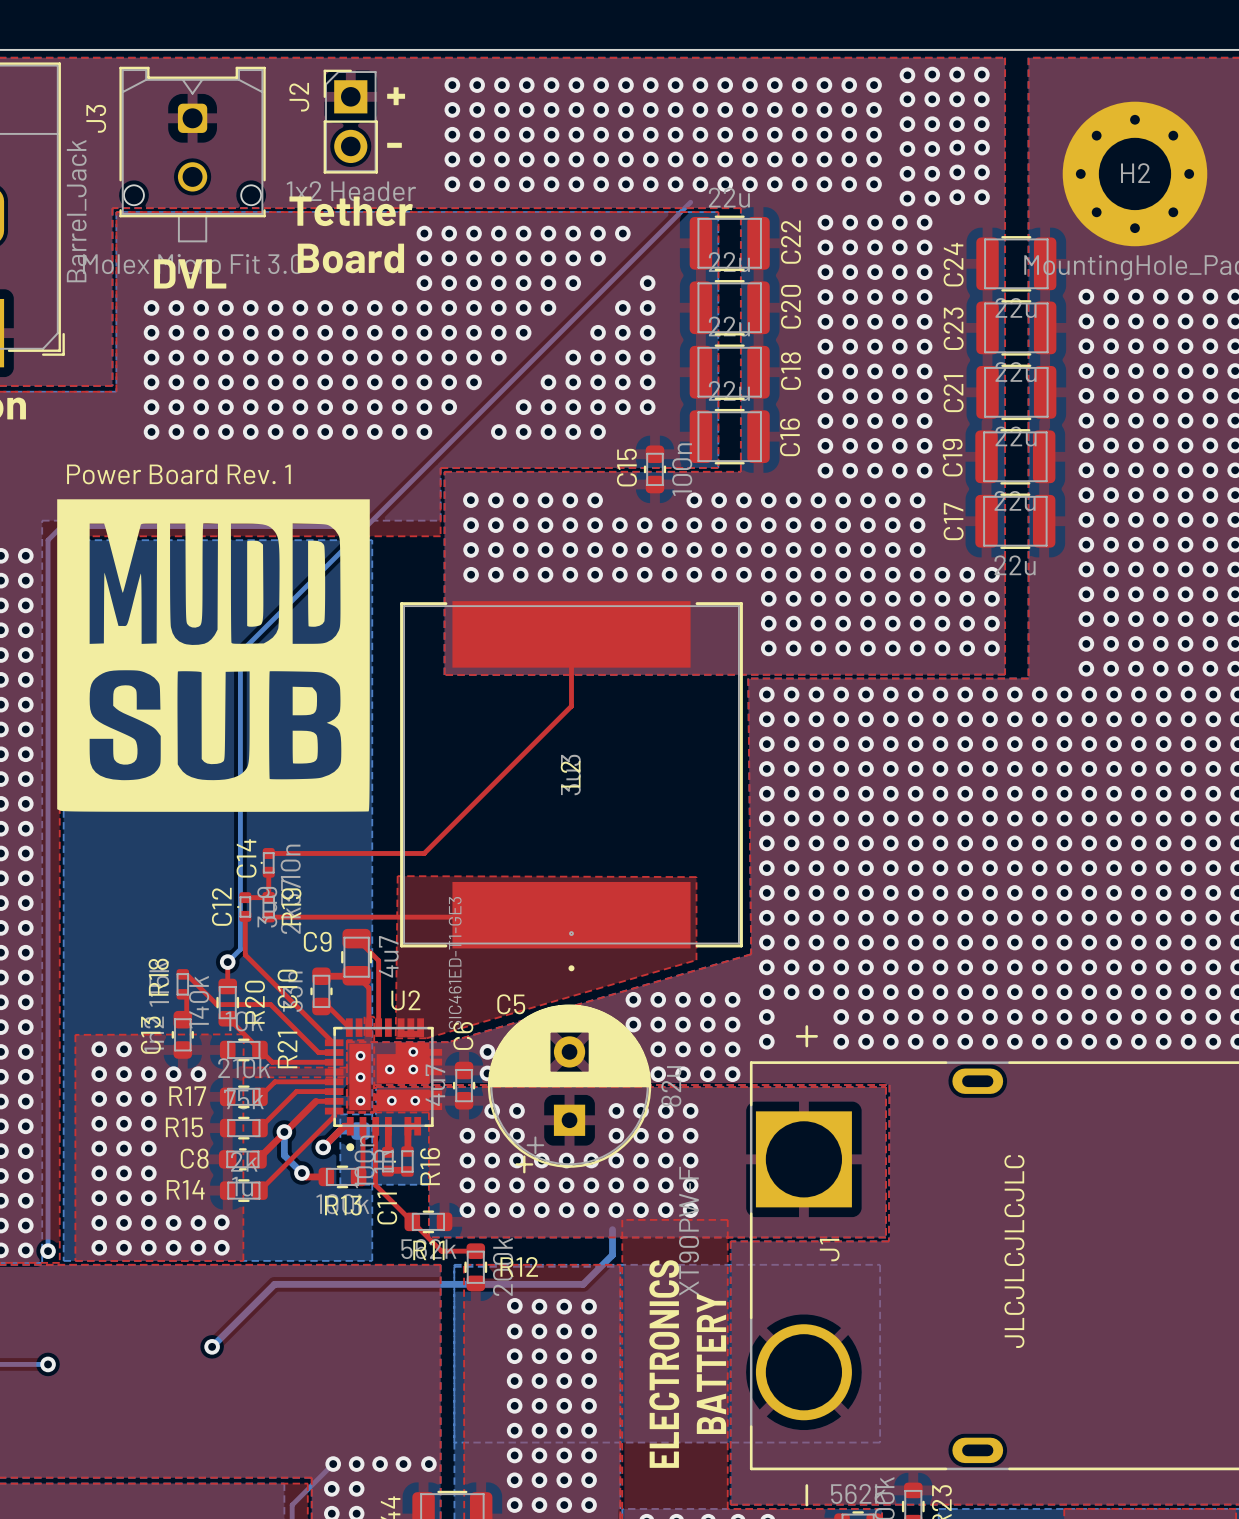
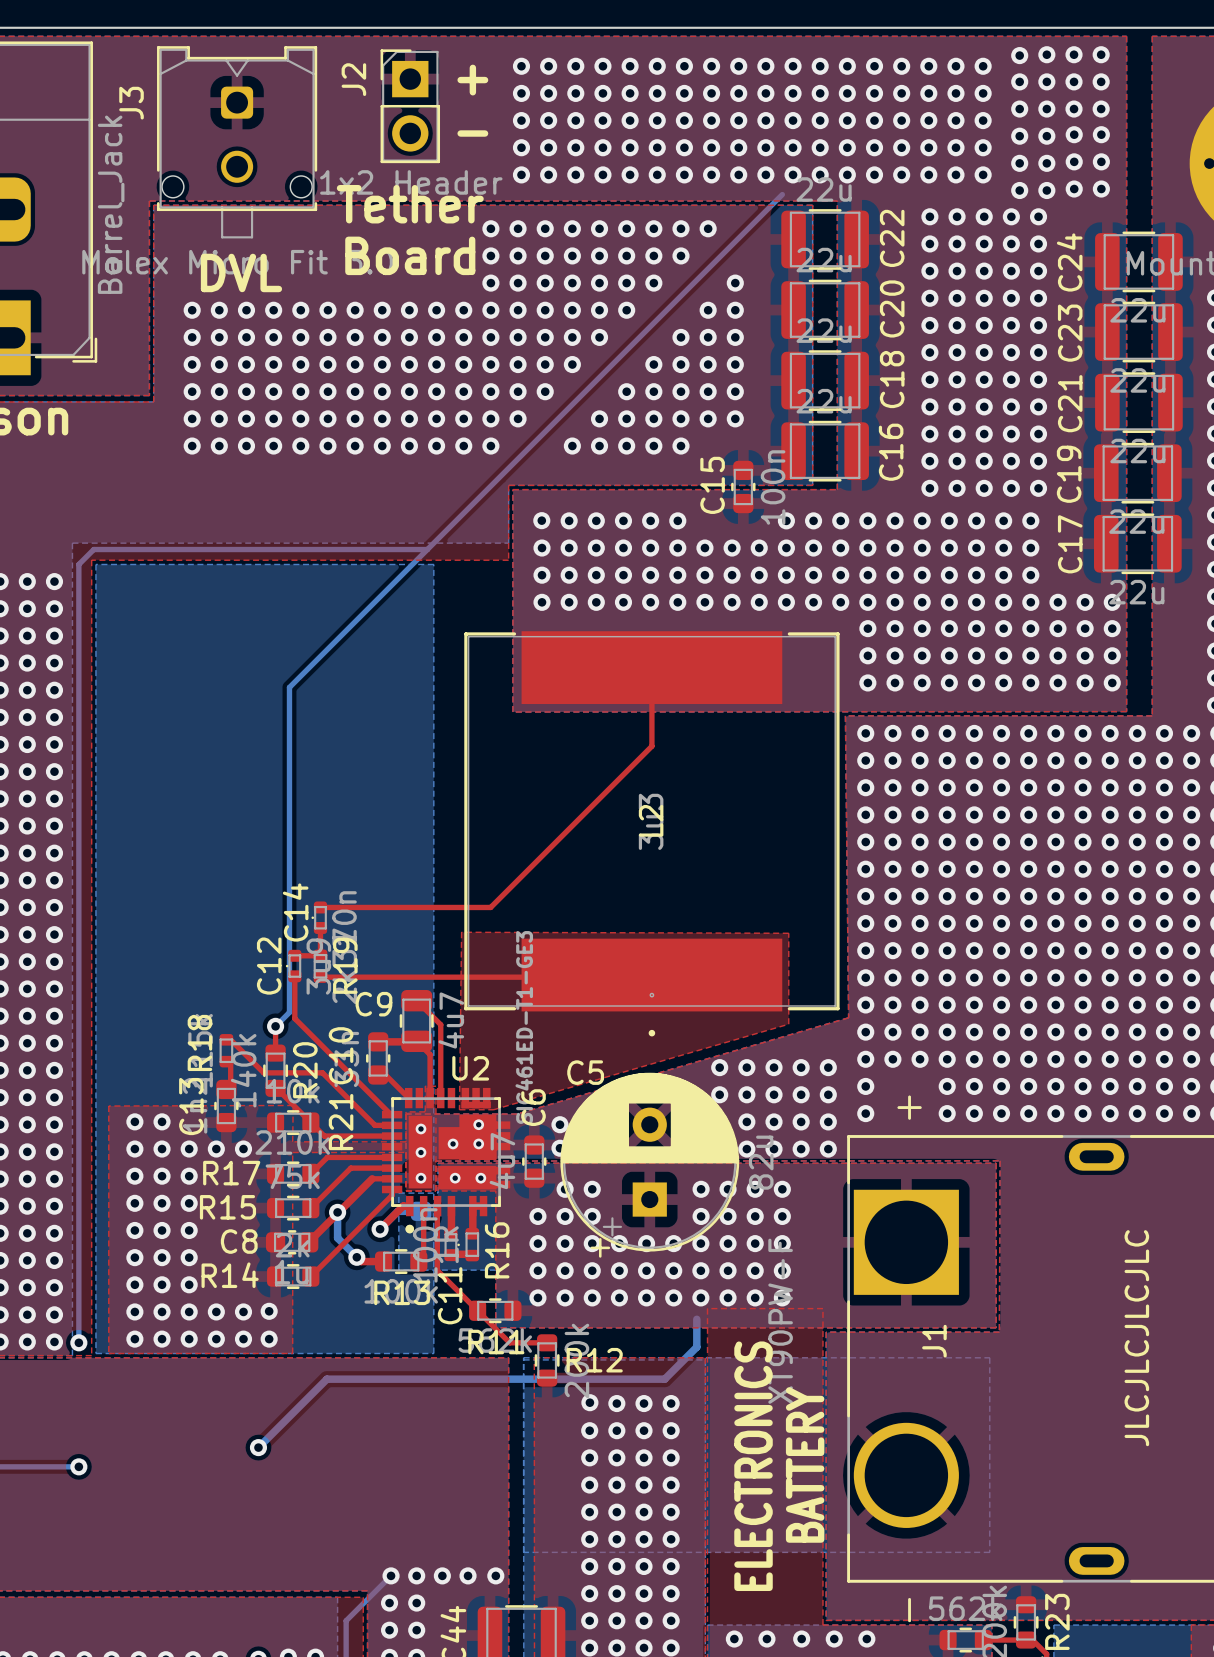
text: Power Board Rev. 1 (178, 474) -> none
drawing: [57, 499, 370, 812] -> none

